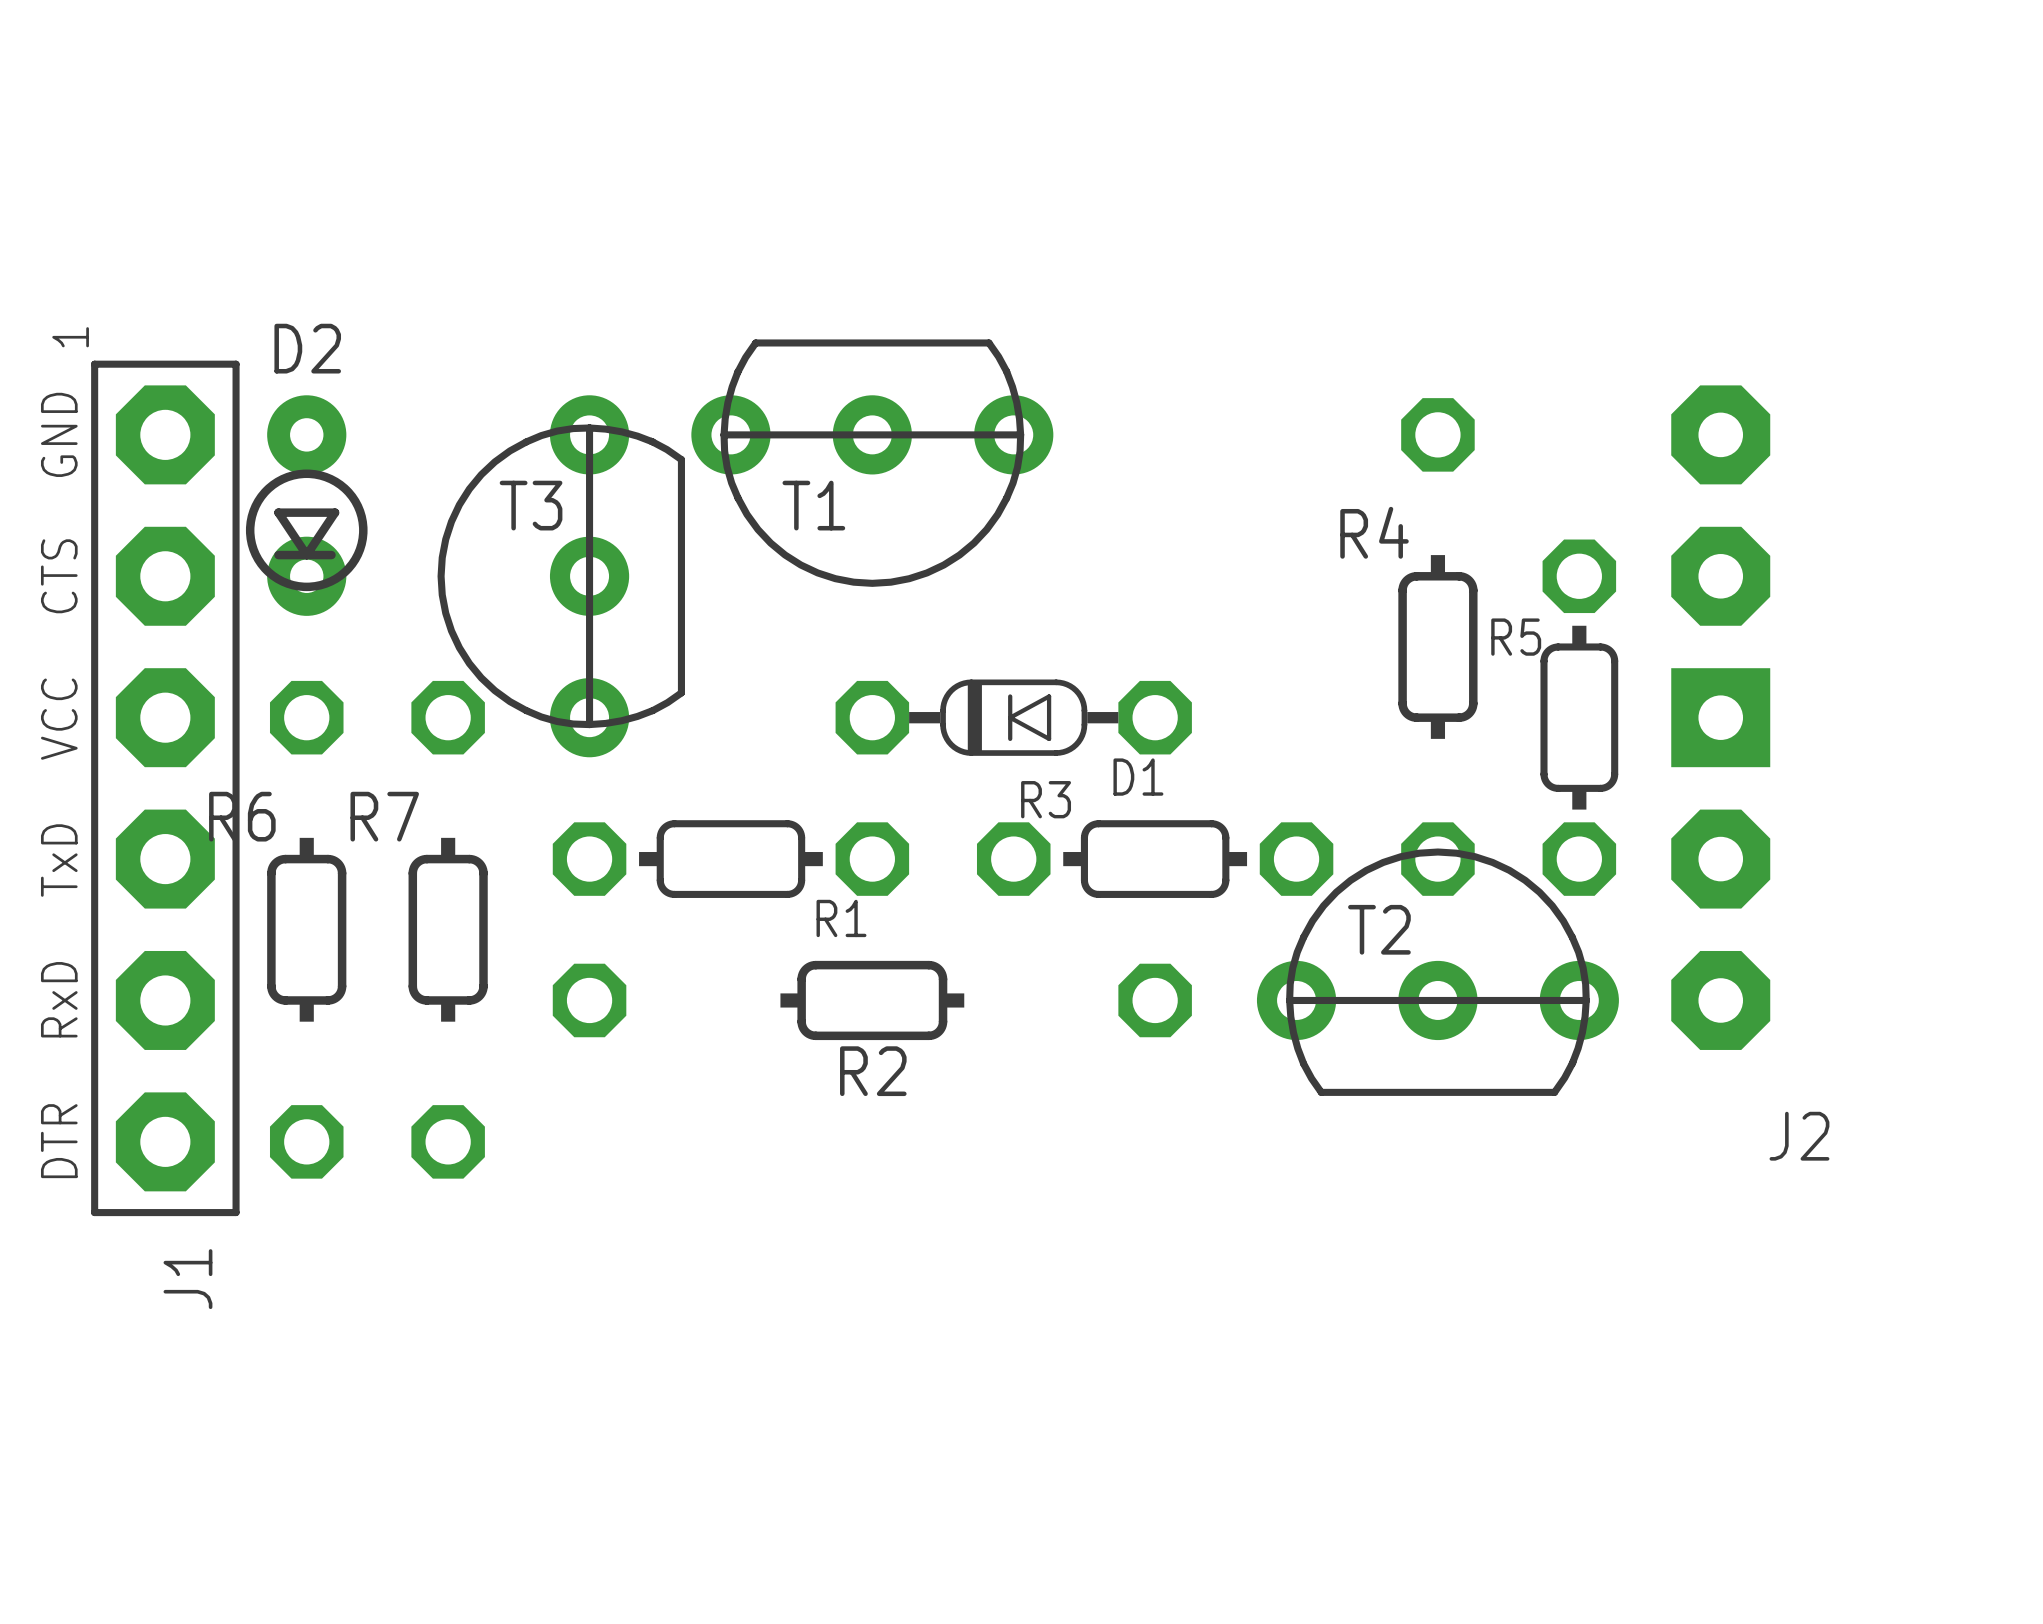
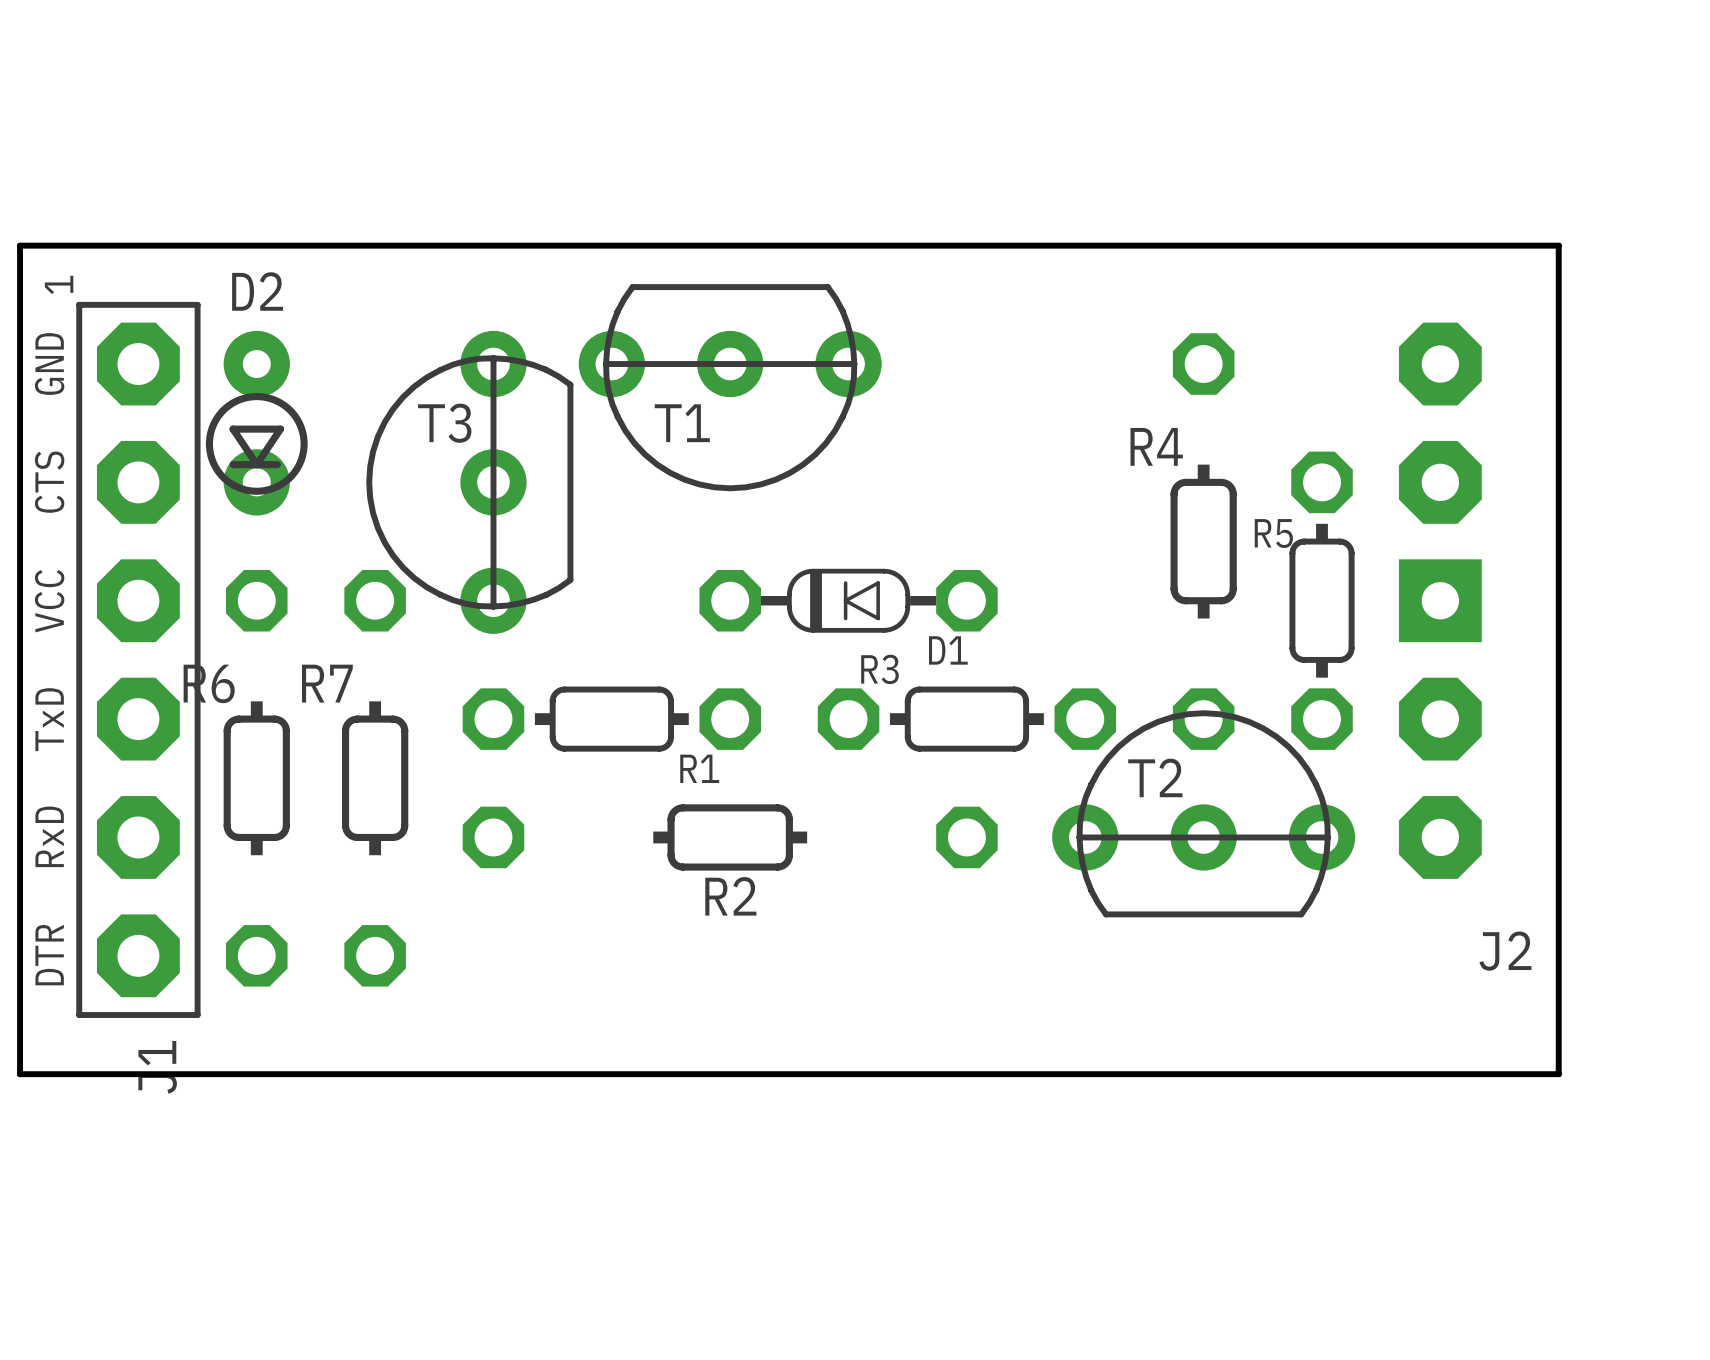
board edge: none -> (20, 245) (20, 1074) (1558, 1074) (1558, 245) (20, 245)

